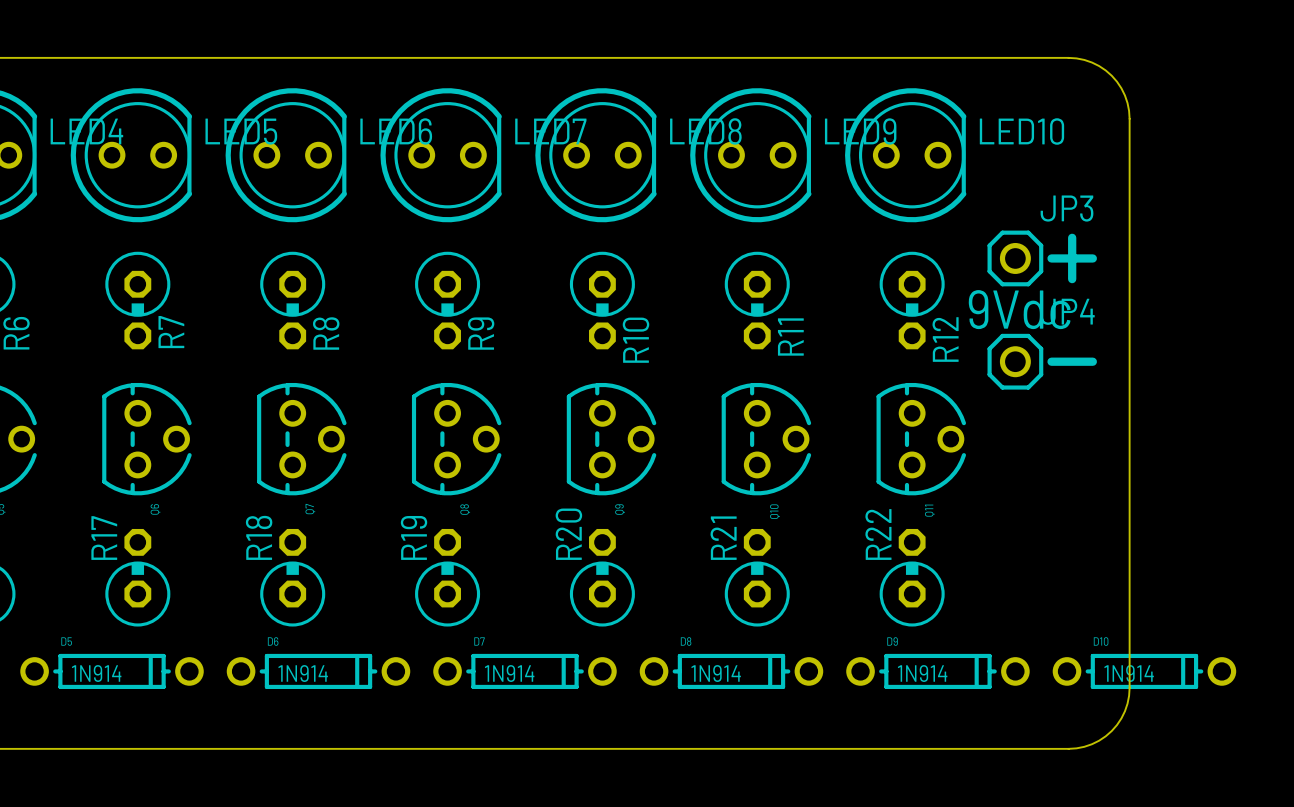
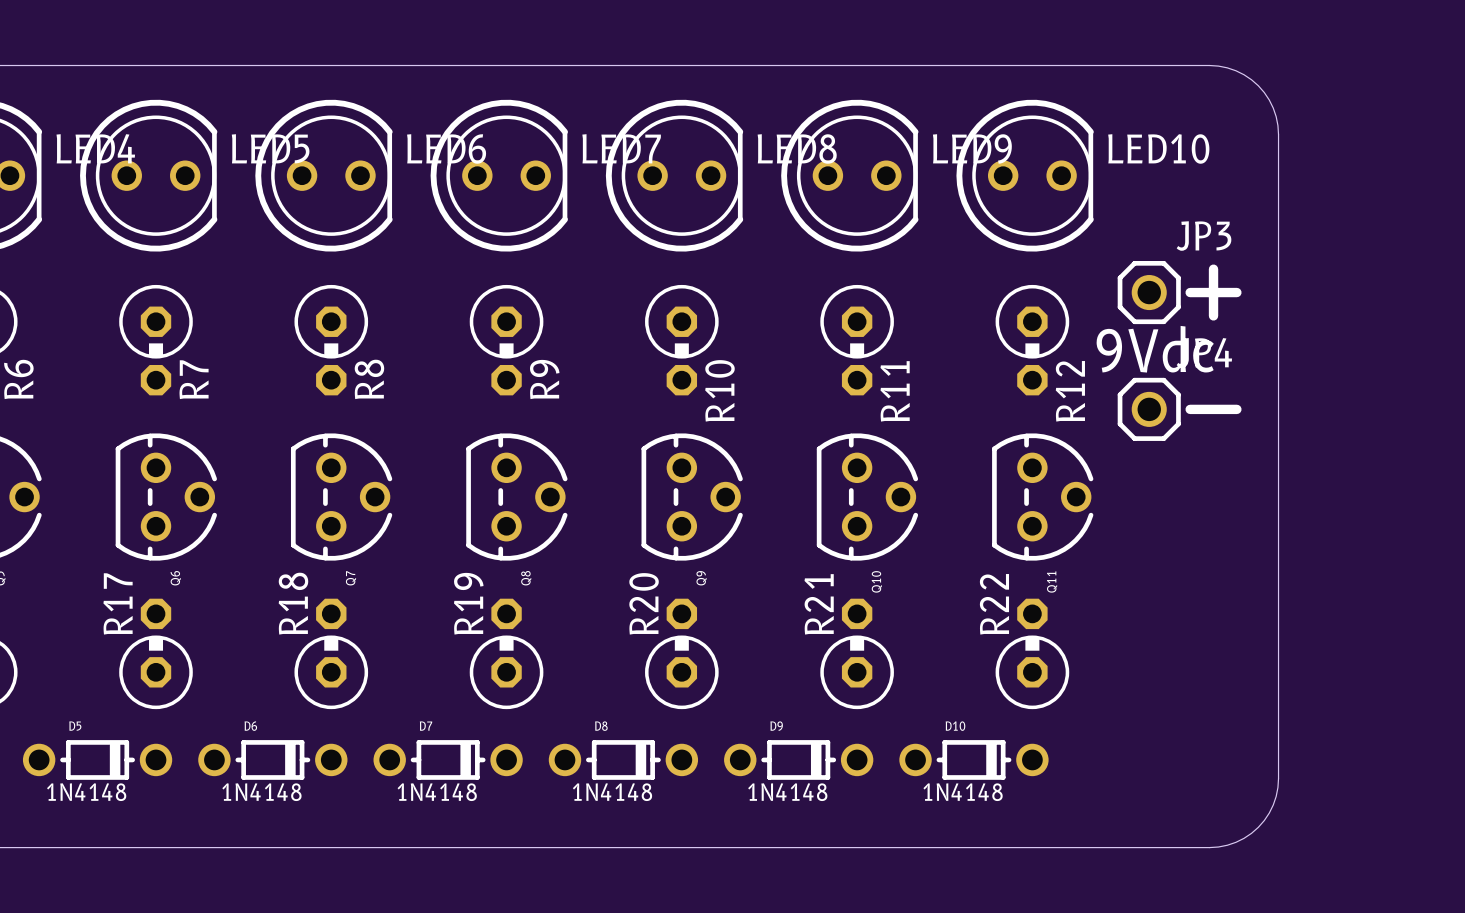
D5 footprint: [20, 653, 204, 689] -> [22, 740, 173, 780]
D6 footprint: [226, 653, 411, 689] -> [198, 740, 348, 780]
D7 footprint: [433, 653, 617, 689] -> [373, 740, 523, 780]
D8 footprint: [639, 653, 824, 689] -> [548, 740, 699, 780]
D9 footprint: [846, 653, 1030, 689] -> [724, 740, 874, 780]
D10 footprint: [1052, 653, 1237, 689] -> [899, 740, 1049, 780]
D5 value: 1N914 (96, 673) -> 1N4148 (86, 792)
D6 value: 1N914 (303, 673) -> 1N4148 (261, 792)
D7 value: 1N914 (509, 673) -> 1N4148 (437, 792)
D8 value: 1N914 (716, 673) -> 1N4148 (612, 792)
D9 value: 1N914 (922, 673) -> 1N4148 (787, 792)
D10 value: 1N914 (1129, 673) -> 1N4148 (963, 792)

